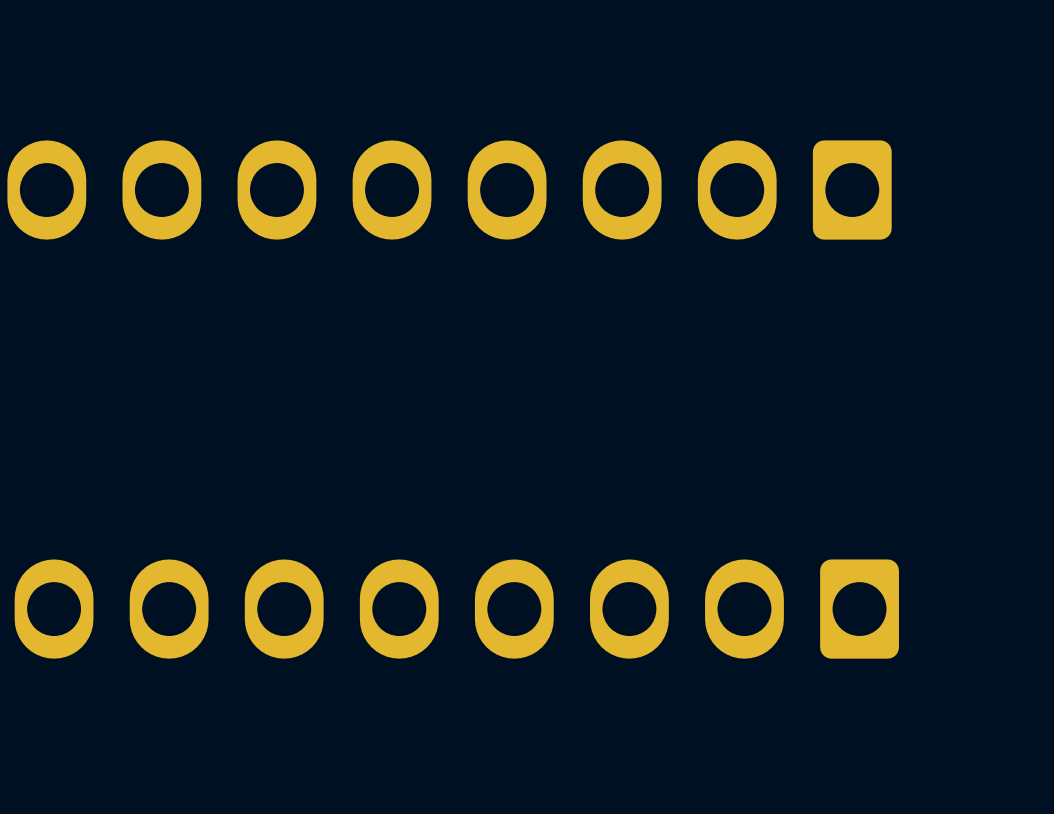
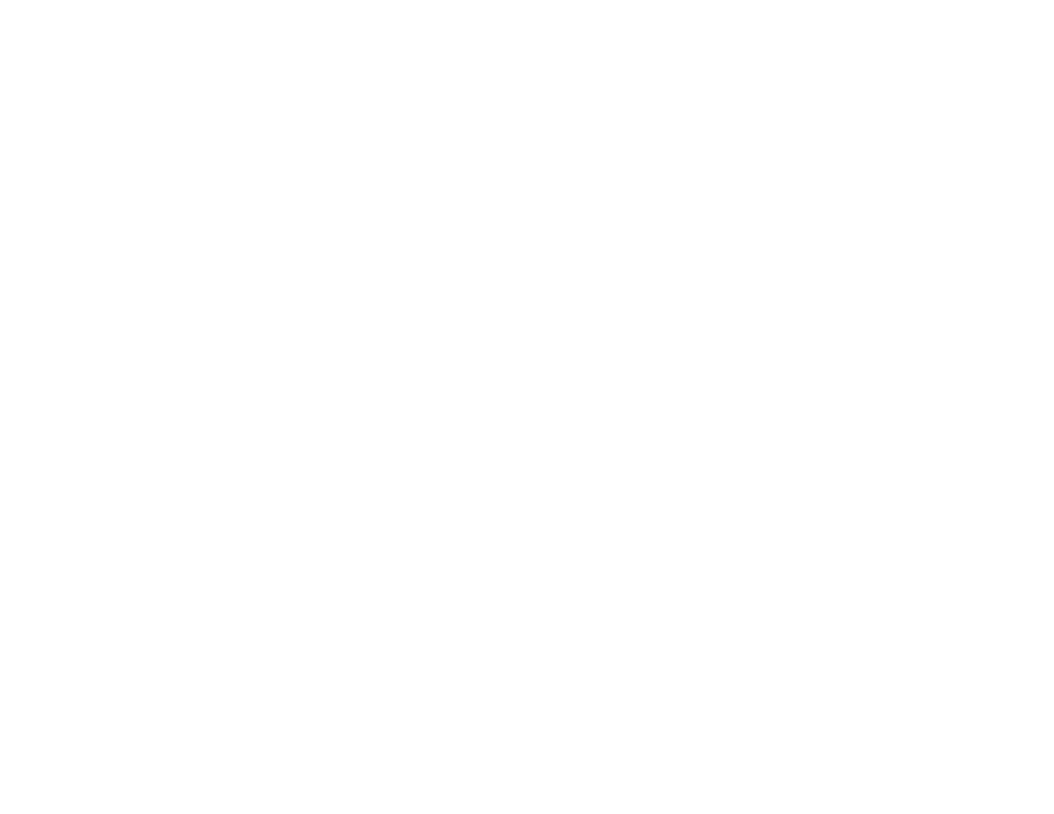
part: (449, 190) -> none
part: (456, 609) -> none

